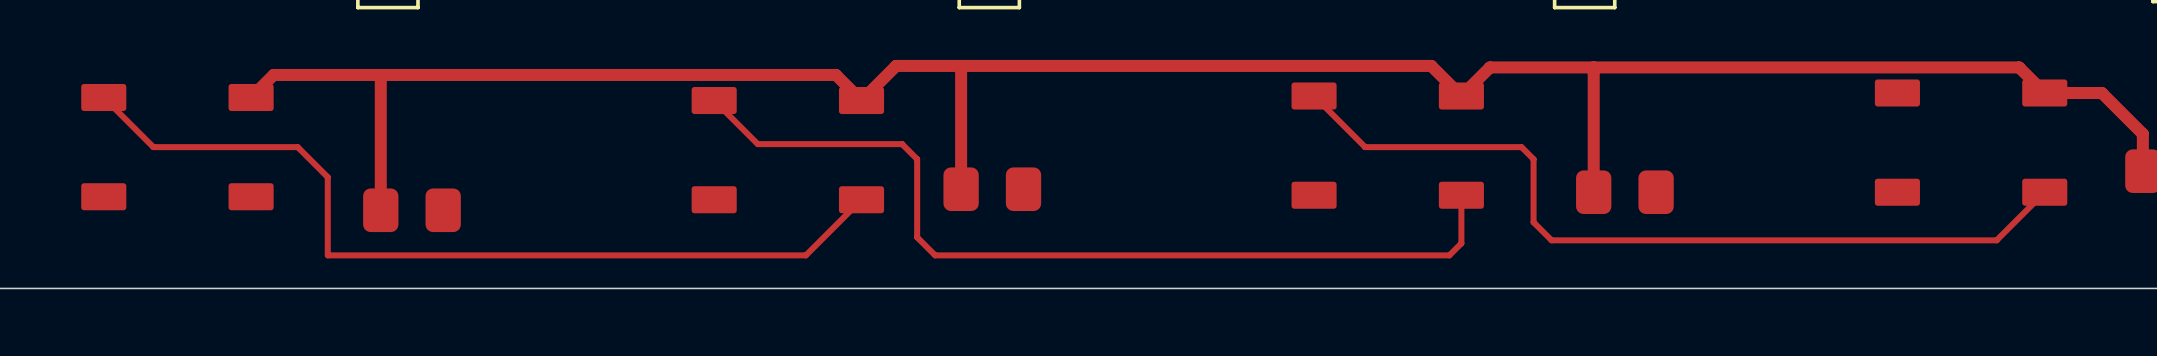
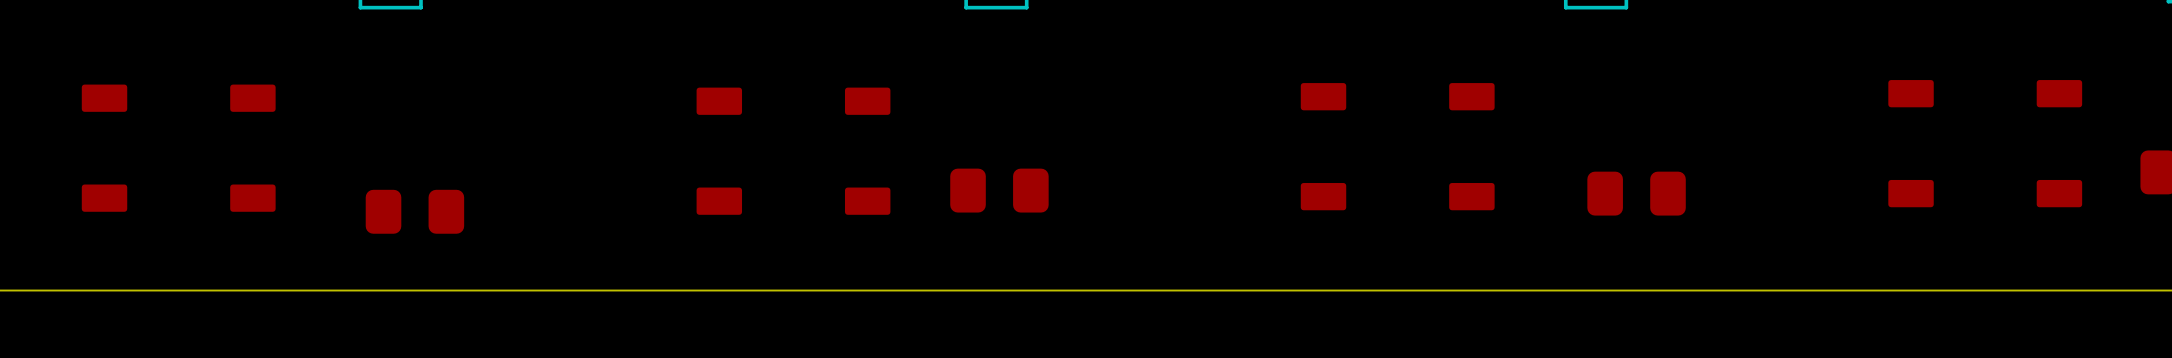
top track: (962, 65) (961, 189) -> none
top track: (1593, 67) (1593, 192) -> none
top track: (381, 74) (380, 210) -> none
top track: (1314, 96) (1365, 147) (1521, 147) (1533, 159) (1533, 222) (1551, 240) (1996, 240) (2044, 192) -> none
top track: (103, 97) (153, 147) (297, 147) (327, 177) (327, 255) (805, 255) (861, 199) -> none
top track: (251, 97) (273, 74) (835, 74) (861, 100) (896, 65) (1431, 65) (1461, 96) (1489, 67) (2019, 67) (2044, 92) (2101, 92) (2142, 133) (2142, 171) -> none
top track: (714, 100) (757, 144) (902, 144) (917, 159) (917, 237) (935, 255) (1449, 255) (1461, 243) (1461, 195) -> none

